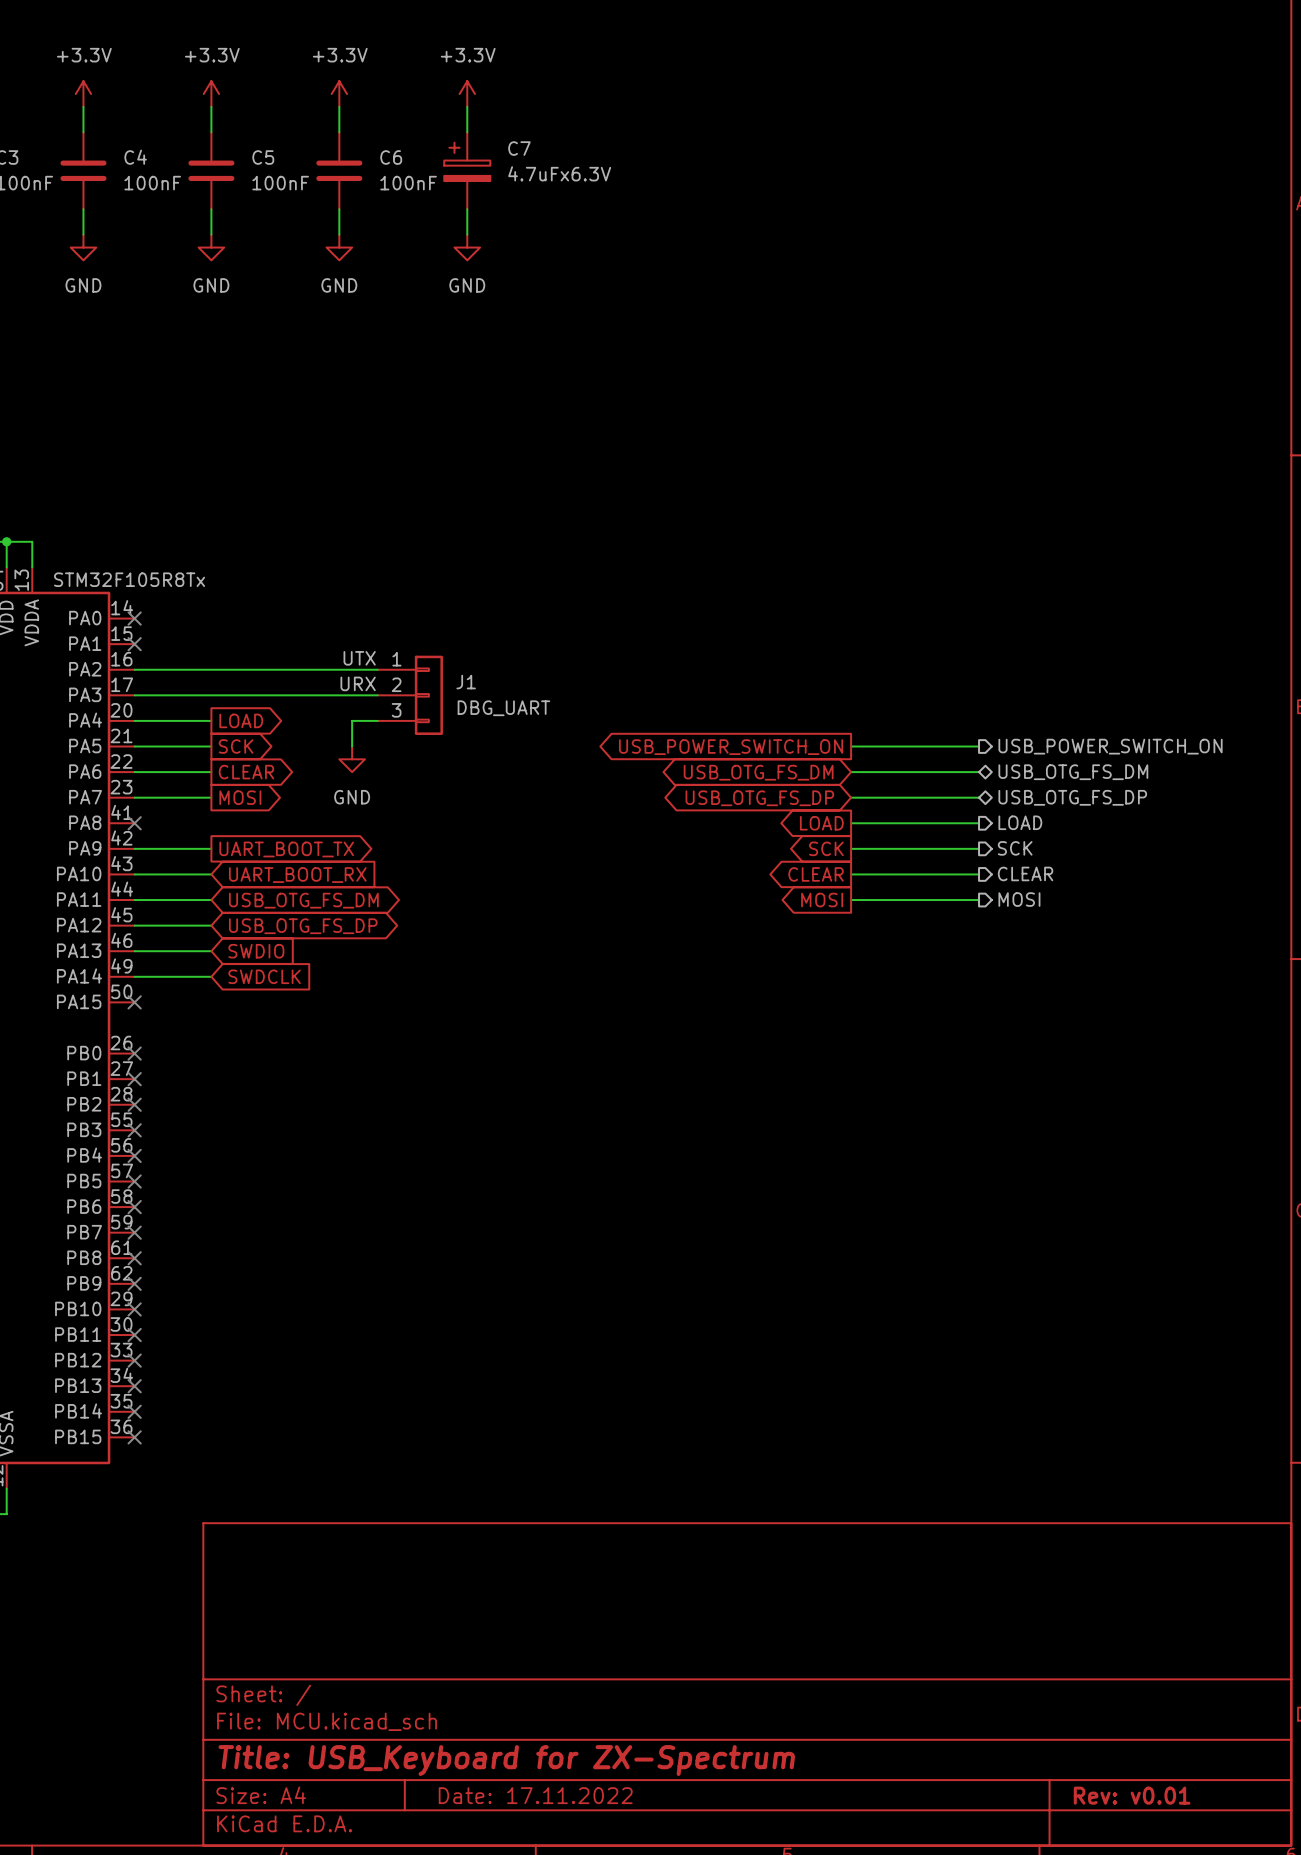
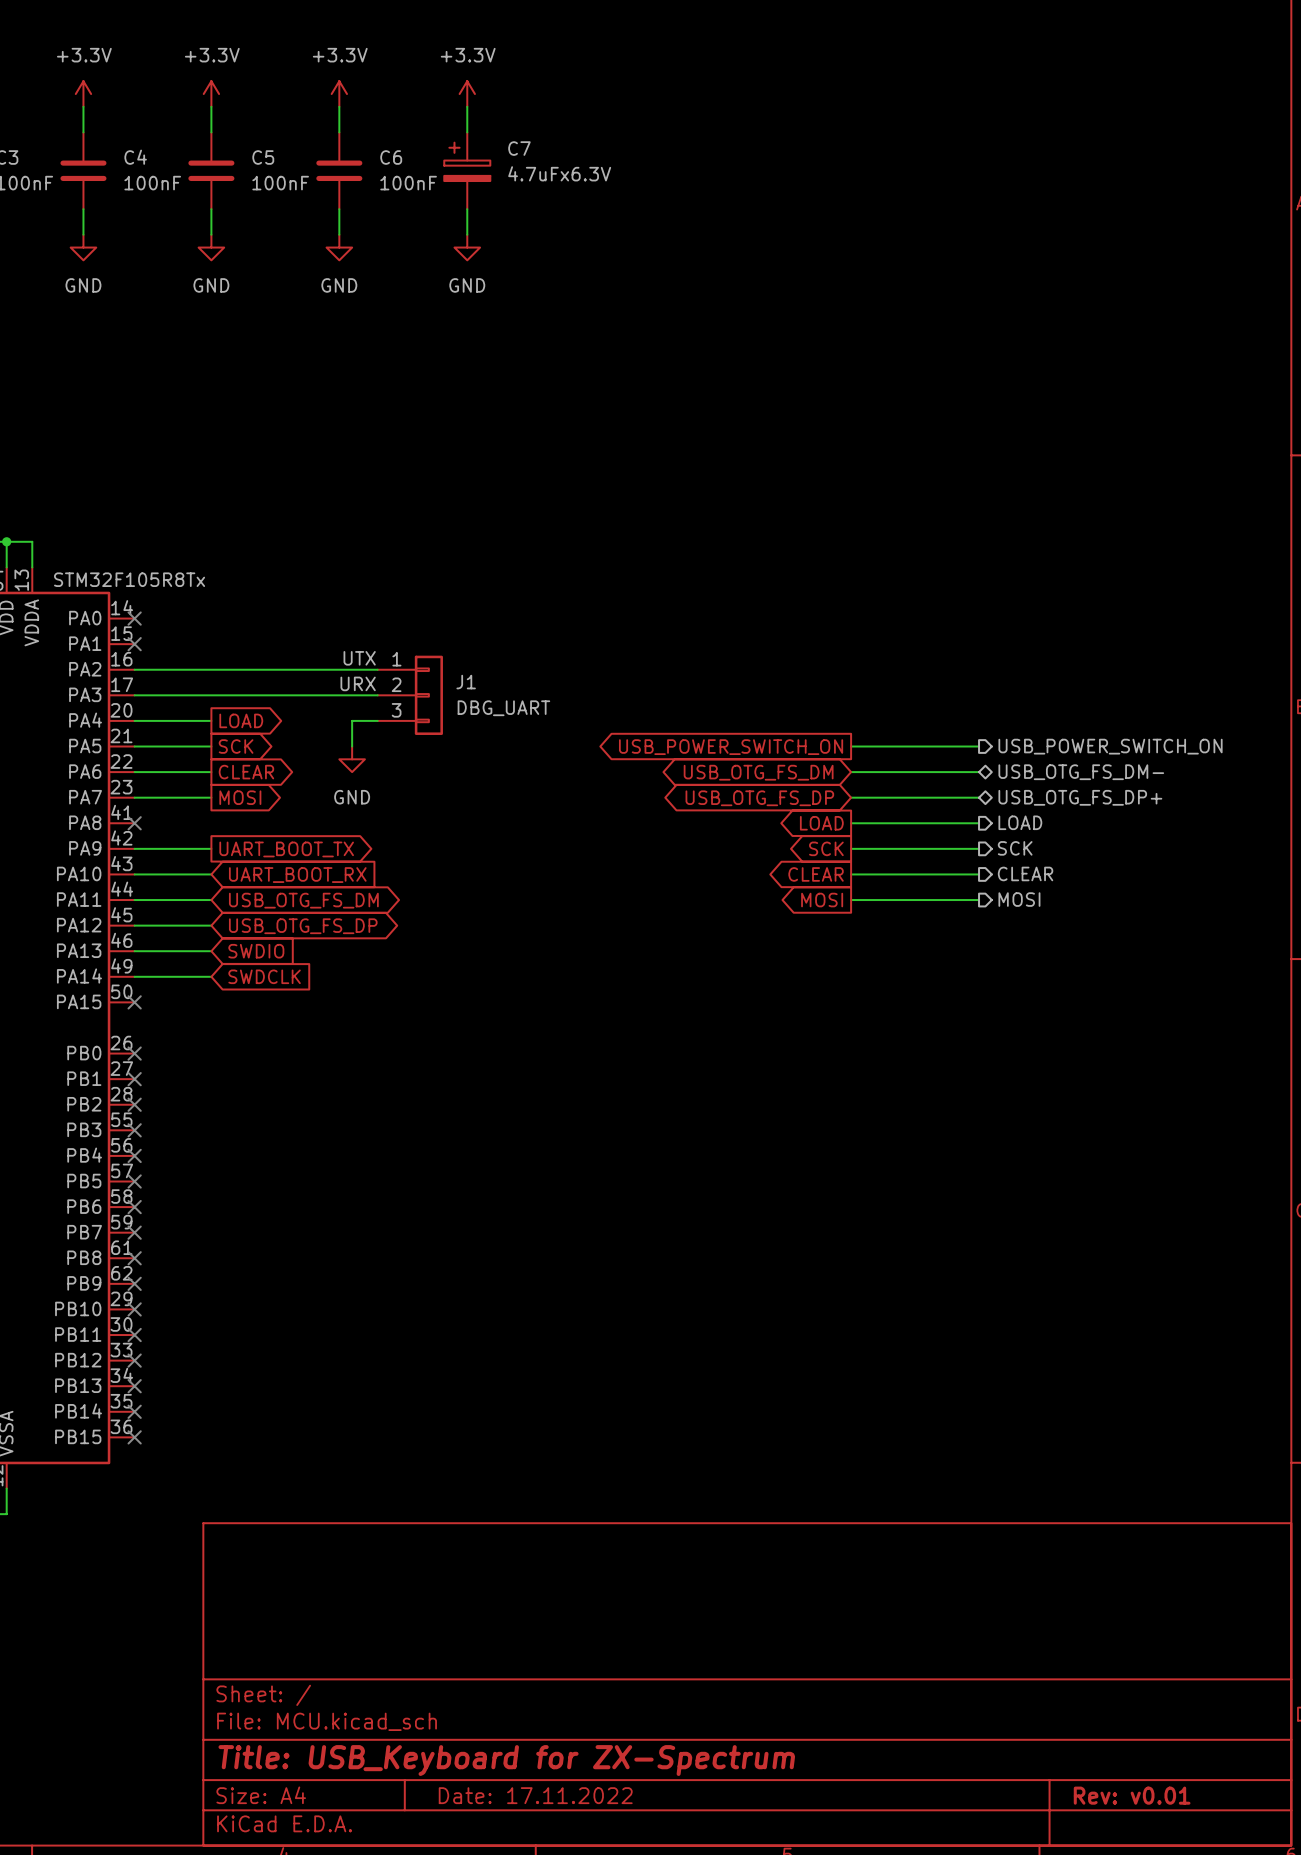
hierarchical label: USB_OTG_FS_DM (1073, 772) -> USB_OTG_FS_DM- (1081, 772)
hierarchical label: USB_OTG_FS_DP (1072, 797) -> USB_OTG_FS_DP+ (1080, 797)

